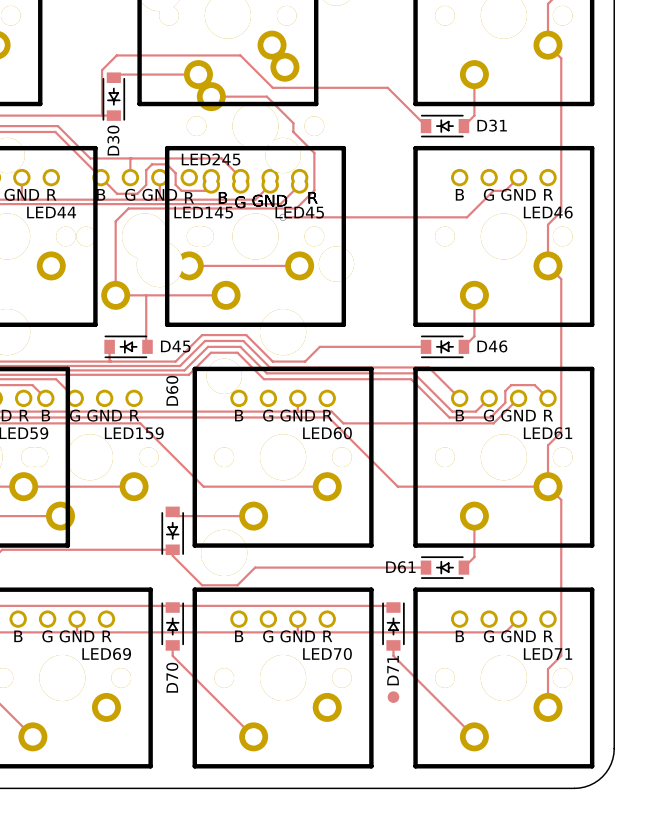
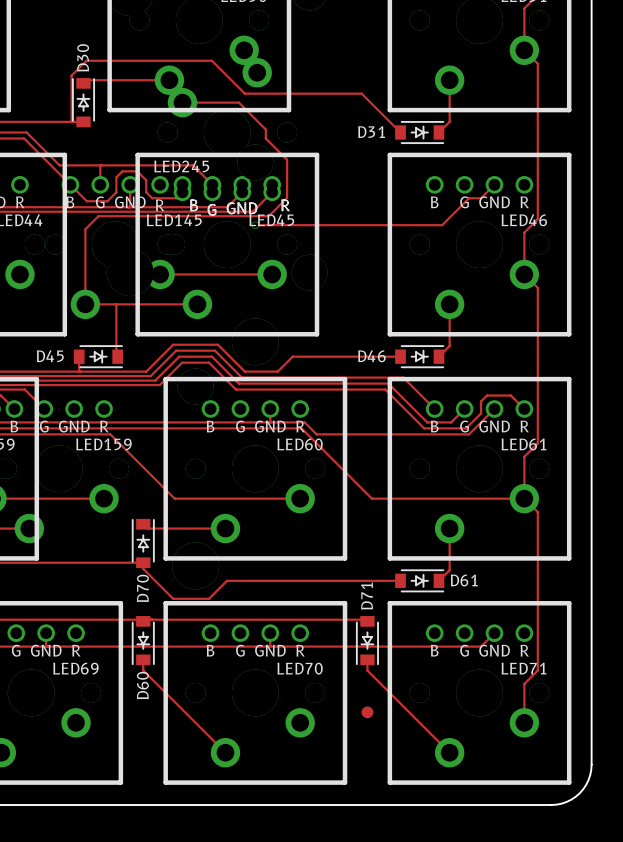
D30 rotation: 0° (113, 96) -> 180° (83, 102)
D31 rotation: 0° (444, 126) -> 180° (419, 132)
D45 rotation: 0° (128, 346) -> 180° (98, 356)
D46 rotation: 0° (444, 346) -> 180° (419, 356)
D60 rotation: 0° (172, 530) -> 180° (143, 543)
D61 rotation: 0° (444, 567) -> 180° (419, 580)
D70 rotation: 0° (172, 626) -> 180° (143, 640)
D71 rotation: 0° (393, 626) -> 180° (367, 640)

